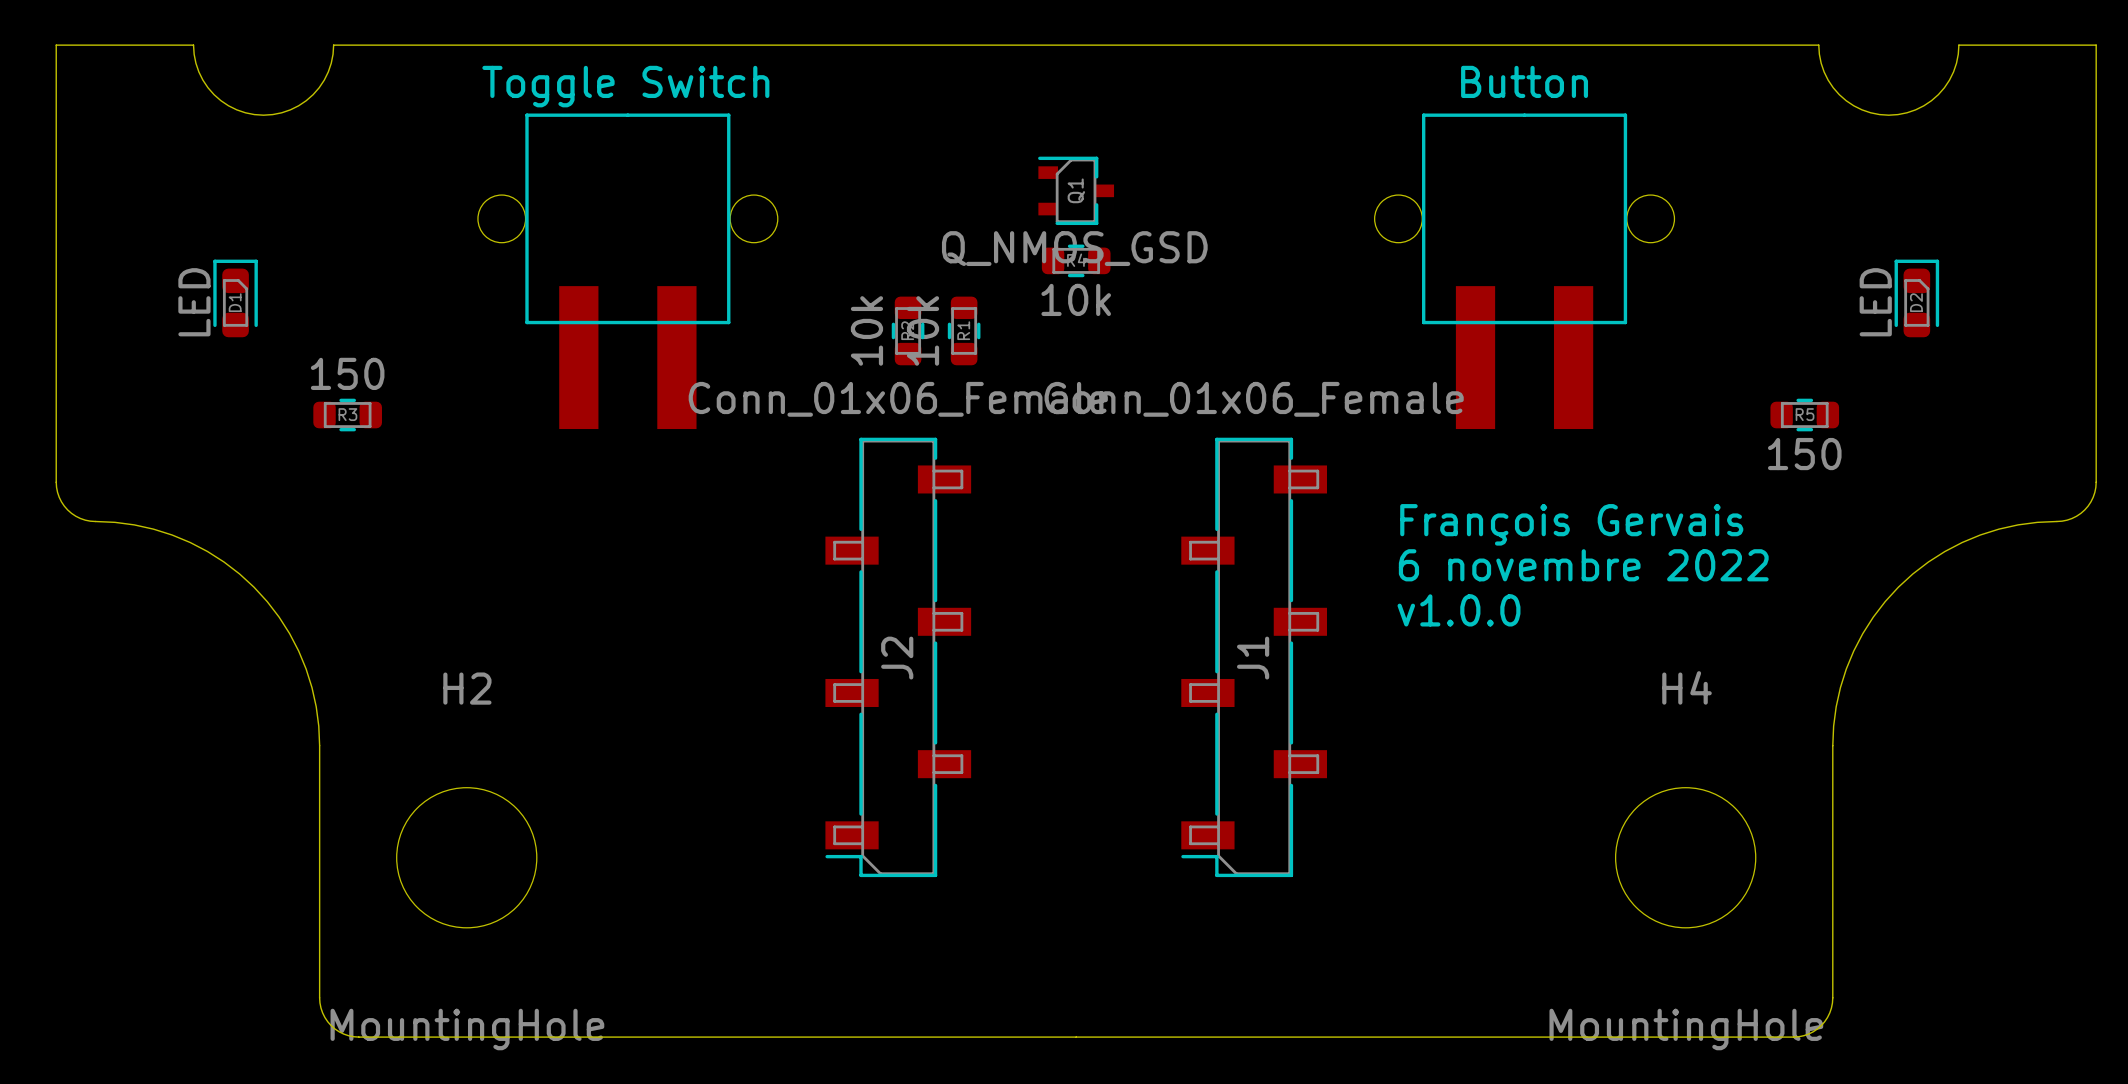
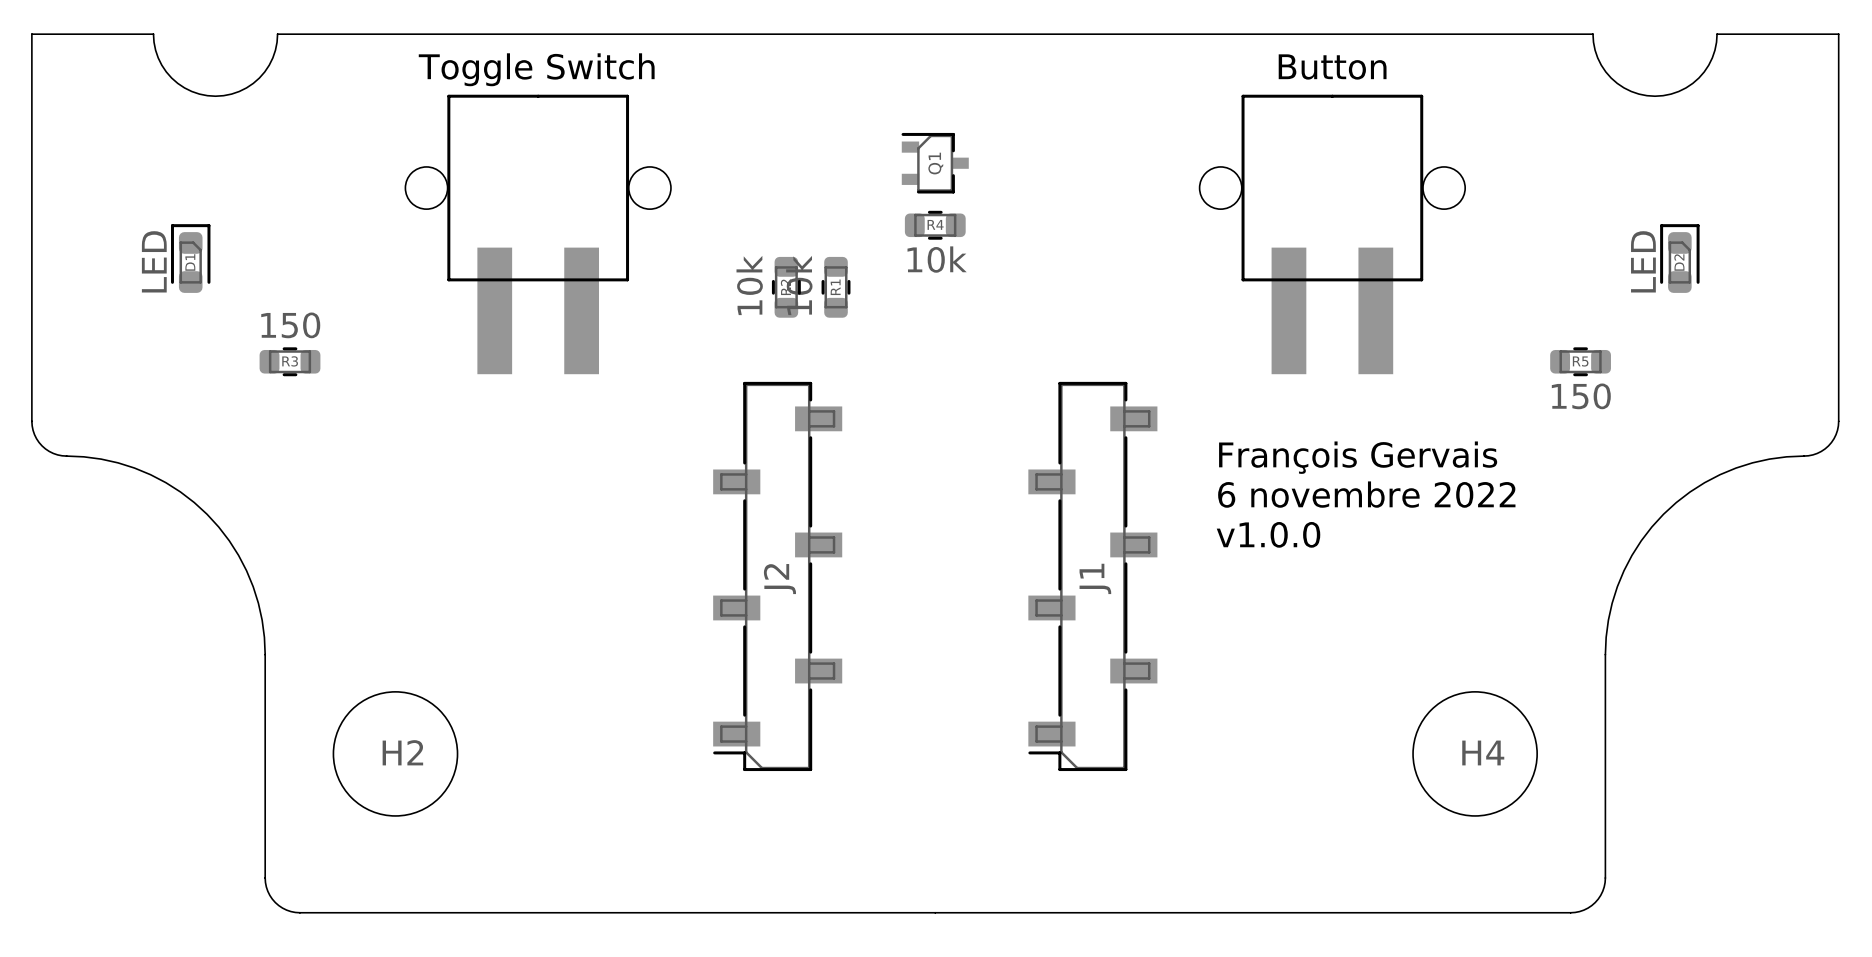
Q1 value: Q_NMOS_GSD (1074, 248) -> none
J2 value: Conn_01x06_Female (898, 399) -> none
J1 value: Conn_01x06_Female (1254, 399) -> none
H4 name position: H4 (1687, 687) -> H4 (1483, 752)
H2 name position: H2 (467, 688) -> H2 (402, 752)
H2 value: MountingHole (467, 1029) -> none
H4 value: MountingHole (1686, 1029) -> none

